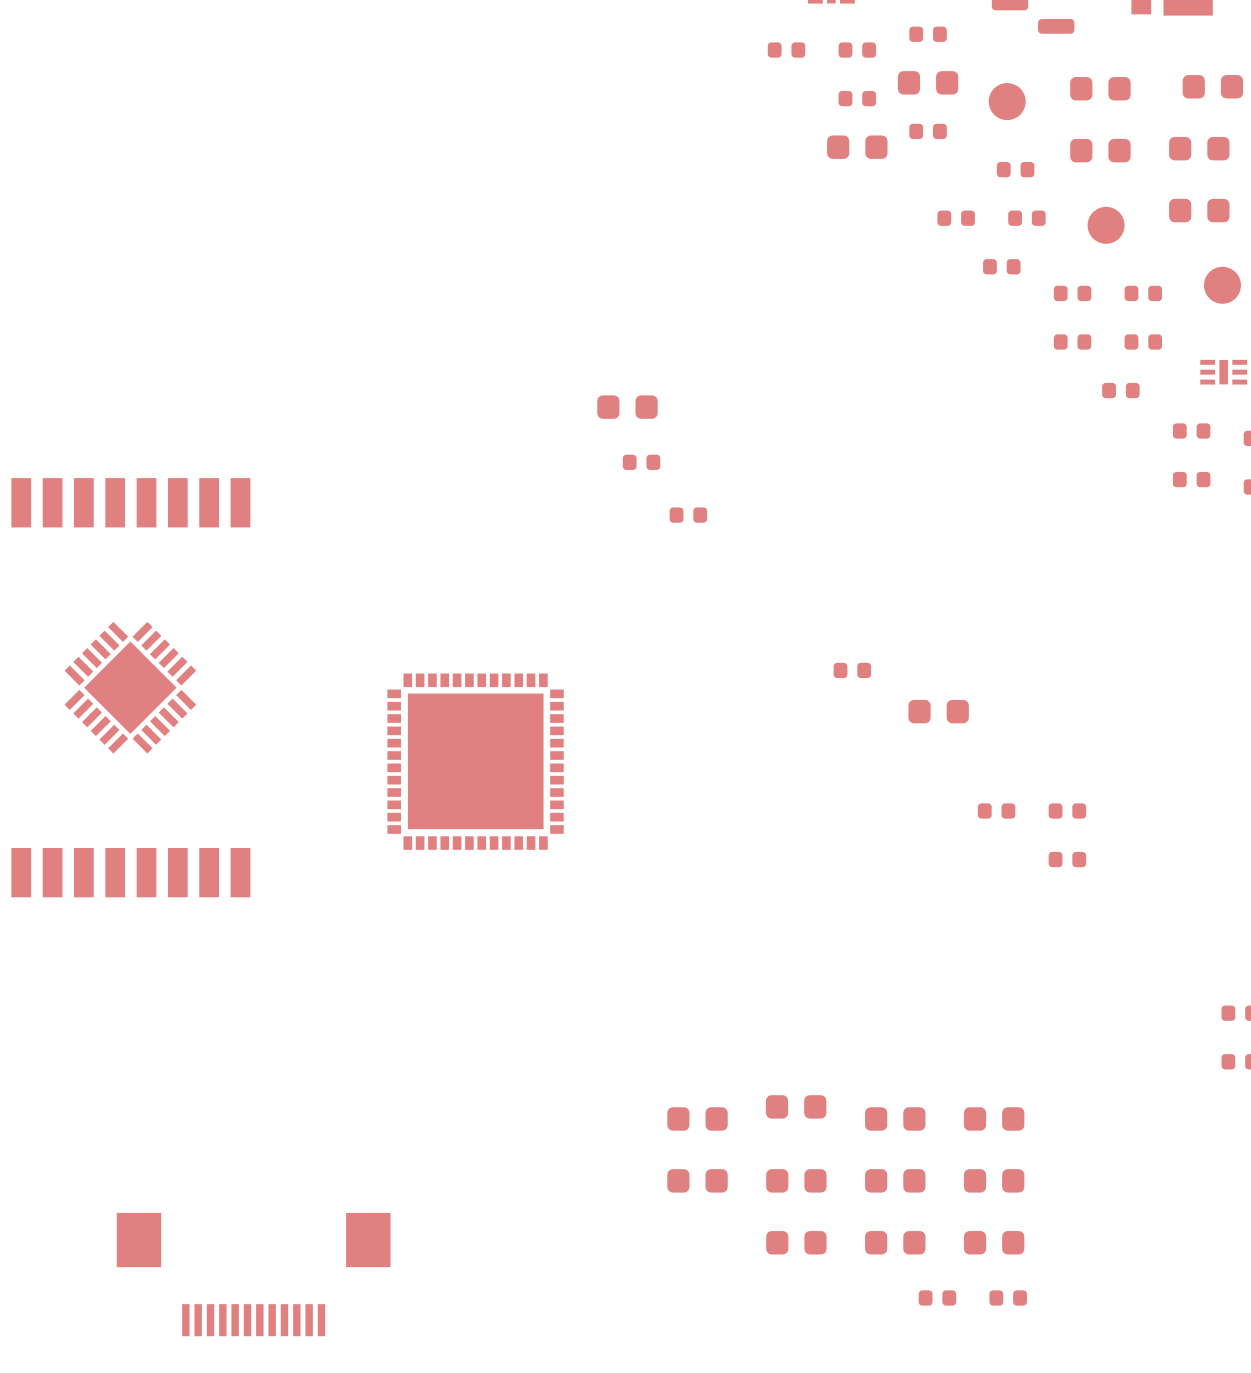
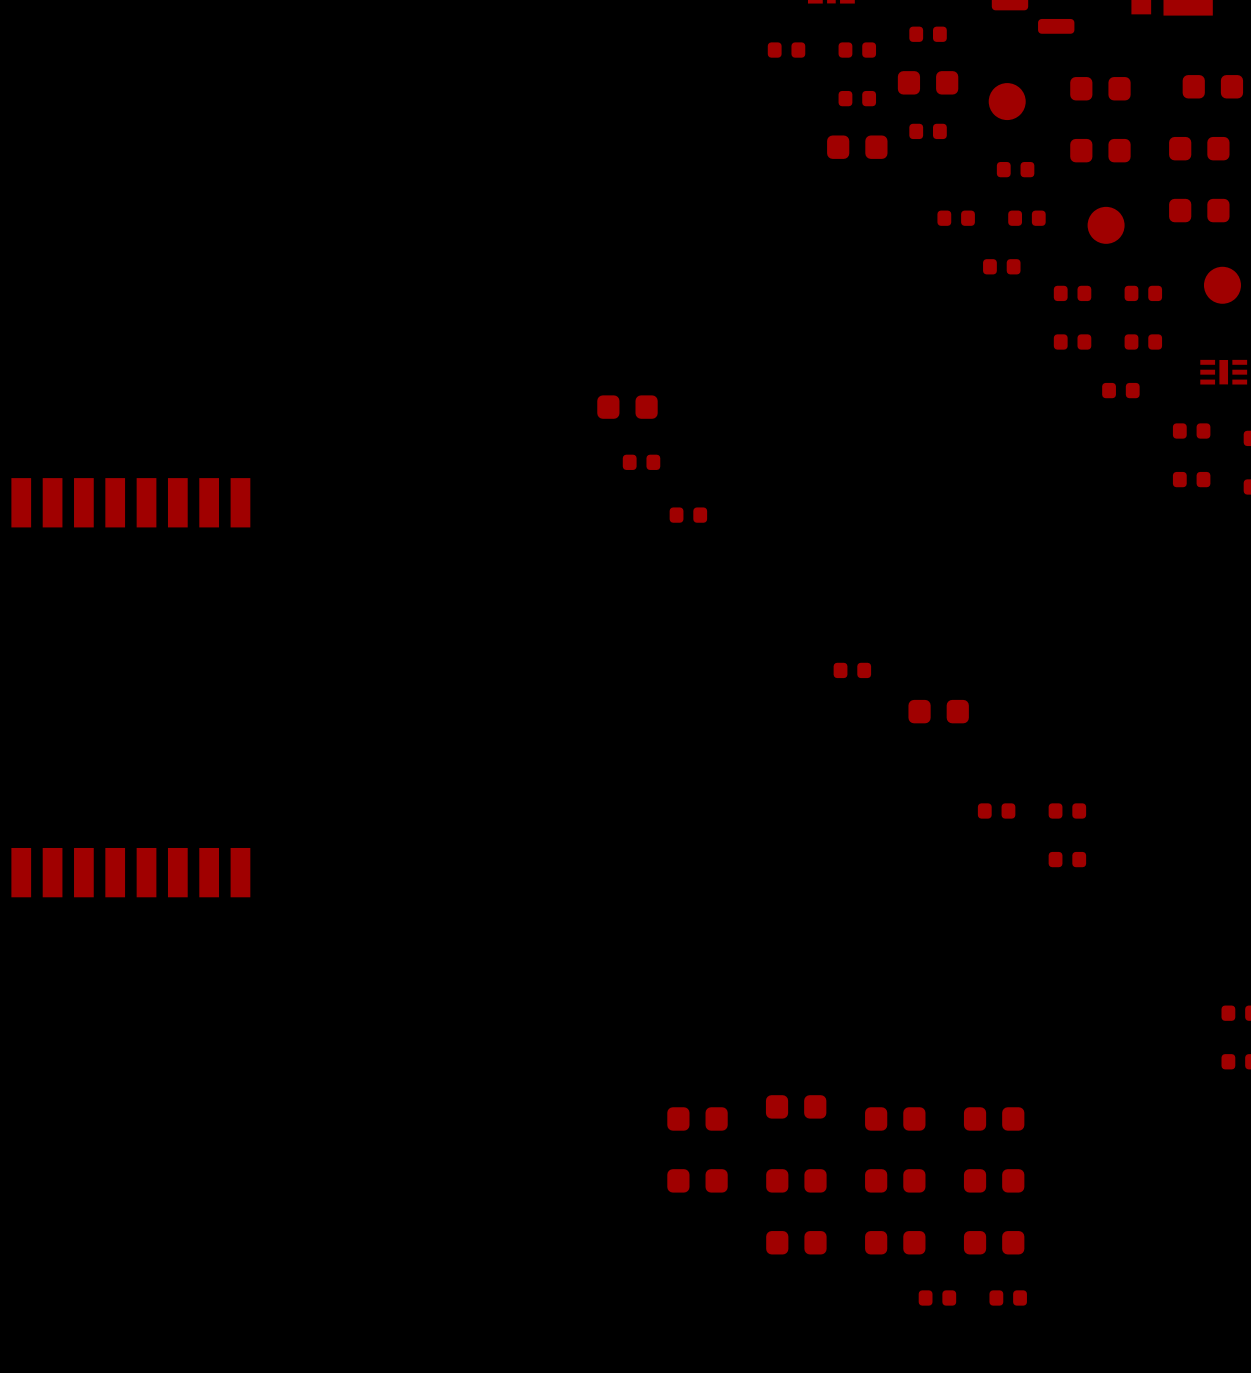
part: (130, 687) -> none
part: (475, 761) -> none
part: (253, 1274) -> none

